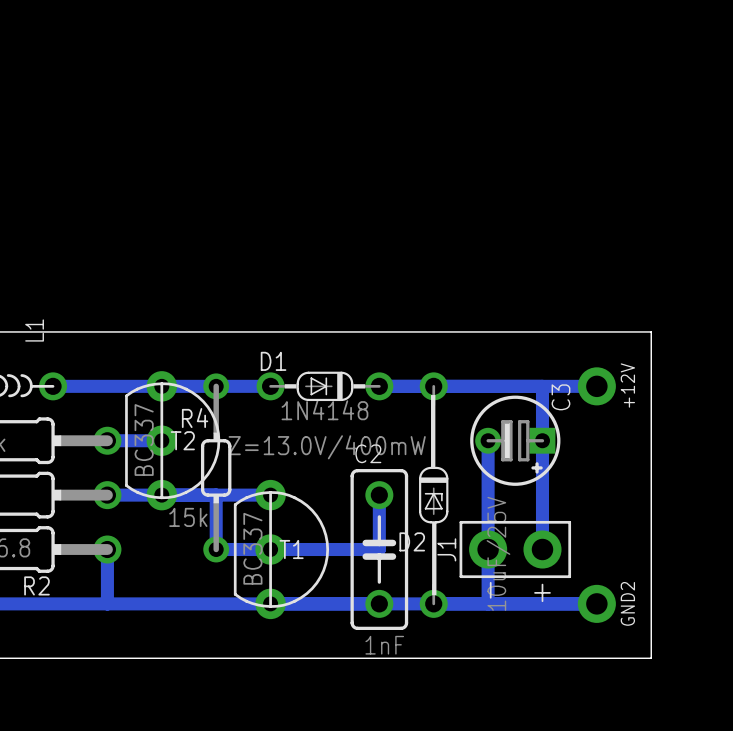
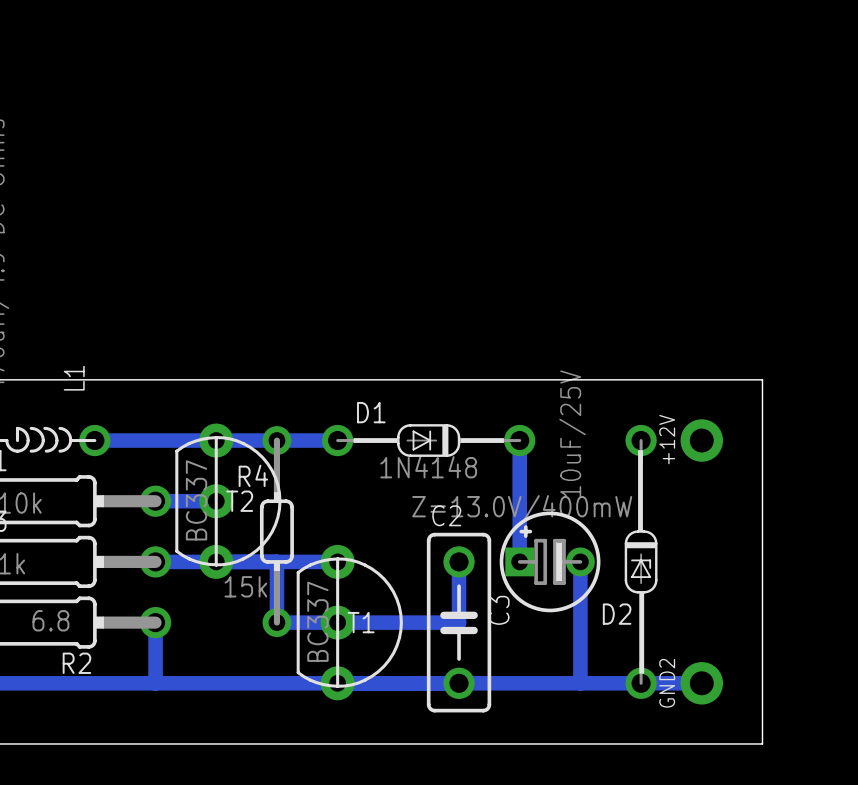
D1 footprint: [256, 371, 394, 402] -> [322, 424, 536, 457]
+12V name position: +12V (627, 385) -> +12V (667, 439)
bottom track: (379, 386) (596, 386) -> none
bottom track: none -> (519, 440) (519, 561)
bottom track: (542, 386) (542, 549) -> none
bottom track: (488, 440) (488, 495) -> none
C3 rotation: 0° (515, 440) -> 180° (550, 561)
C3 position: (515, 440) -> (550, 561)
D2 position: (433, 495) -> (641, 561)
J1: (515, 549) -> none
GND2 name position: GND2 (627, 603) -> GND2 (667, 683)
C2 value: 1nF (384, 645) -> none

